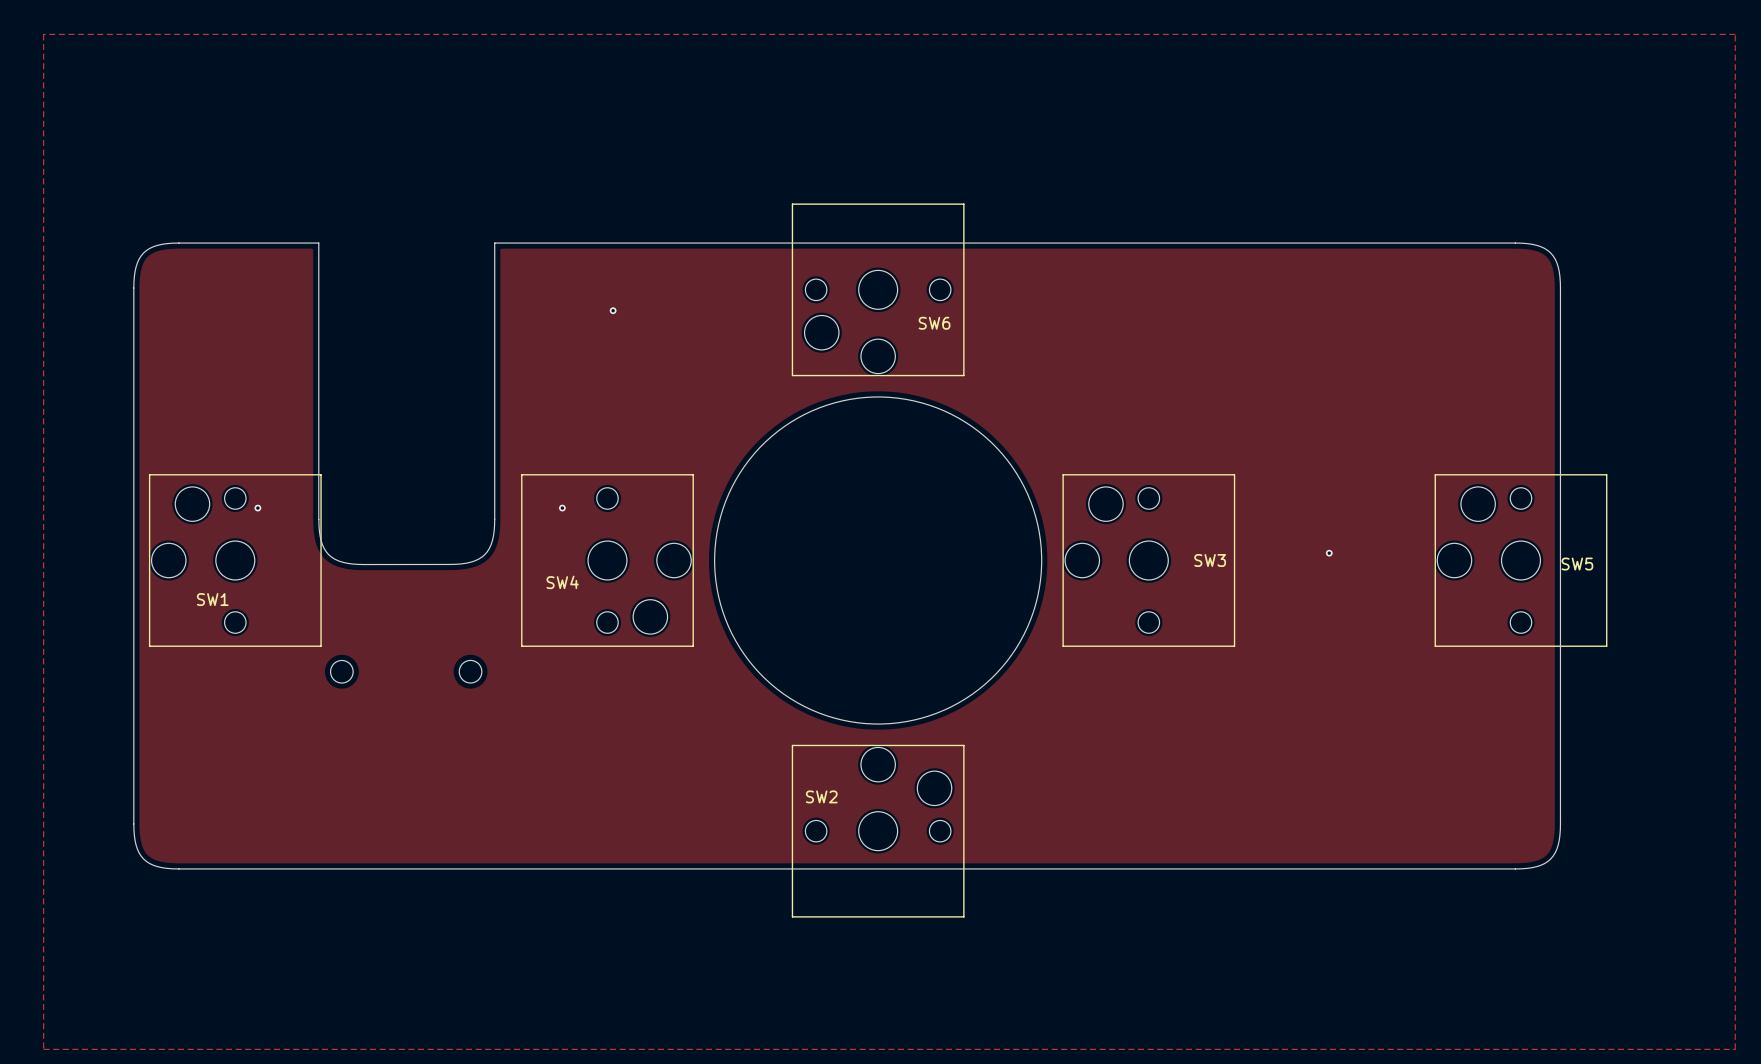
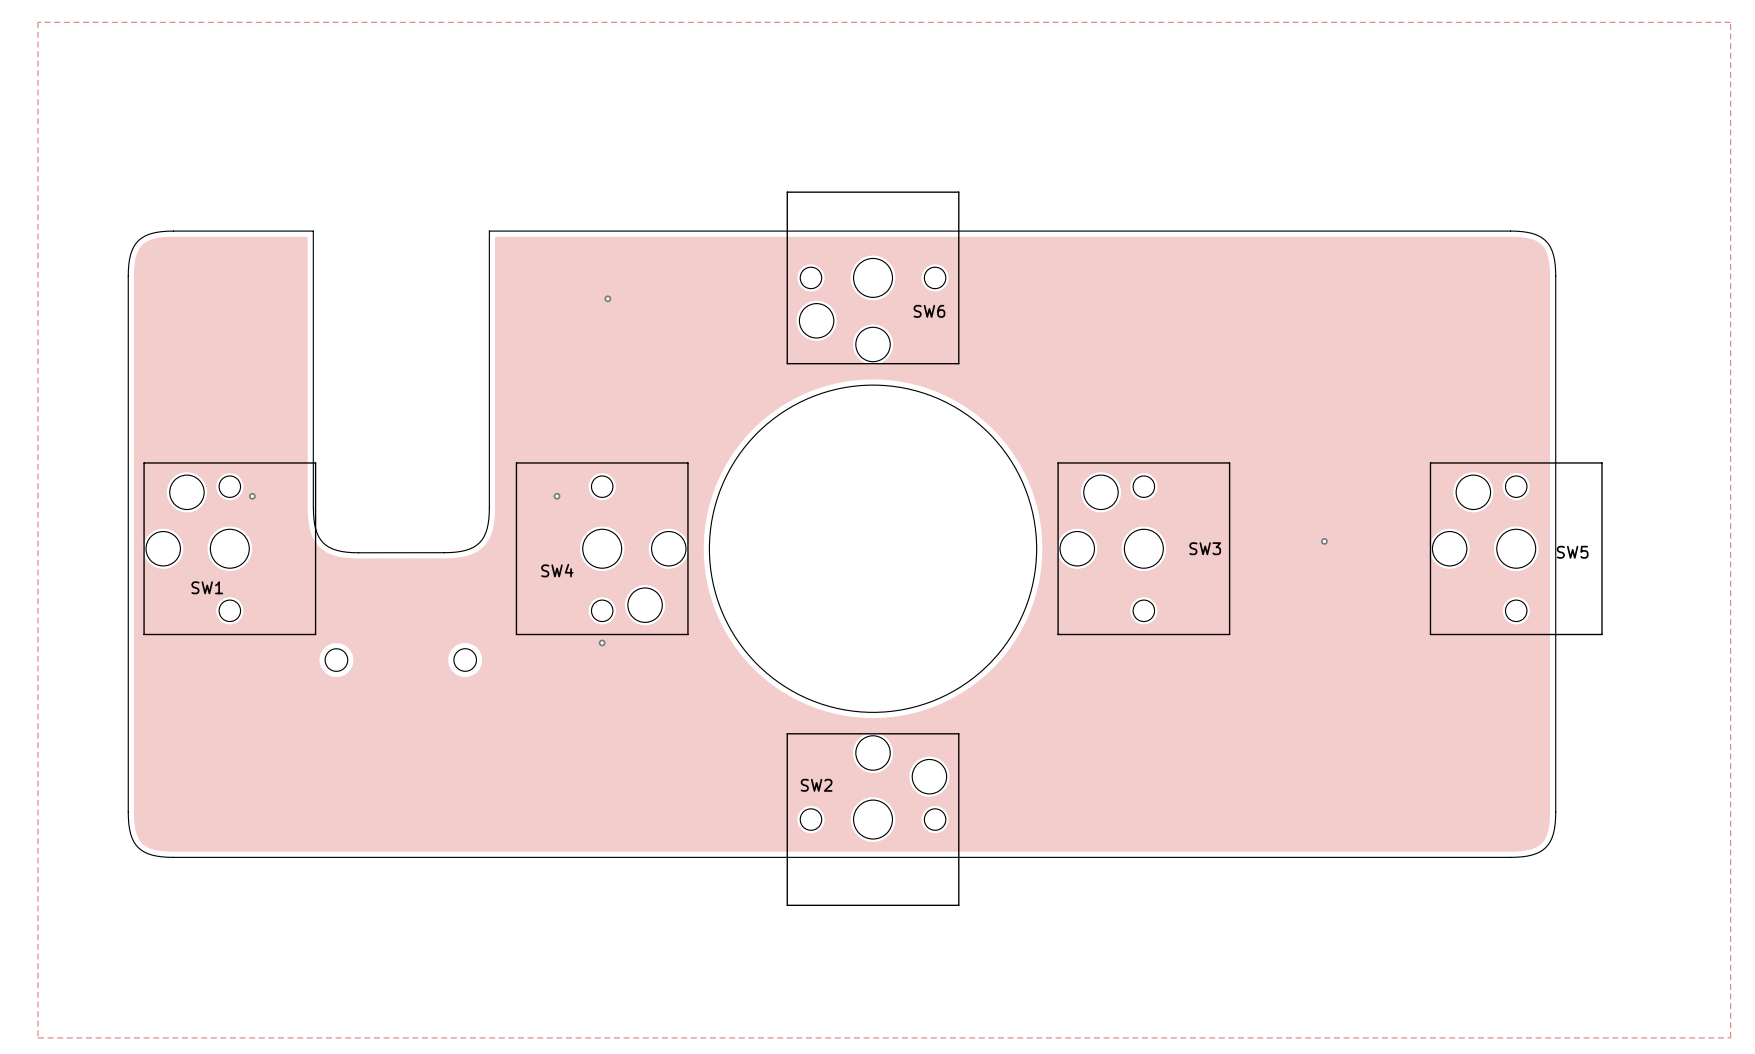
via: none -> (602, 642)

